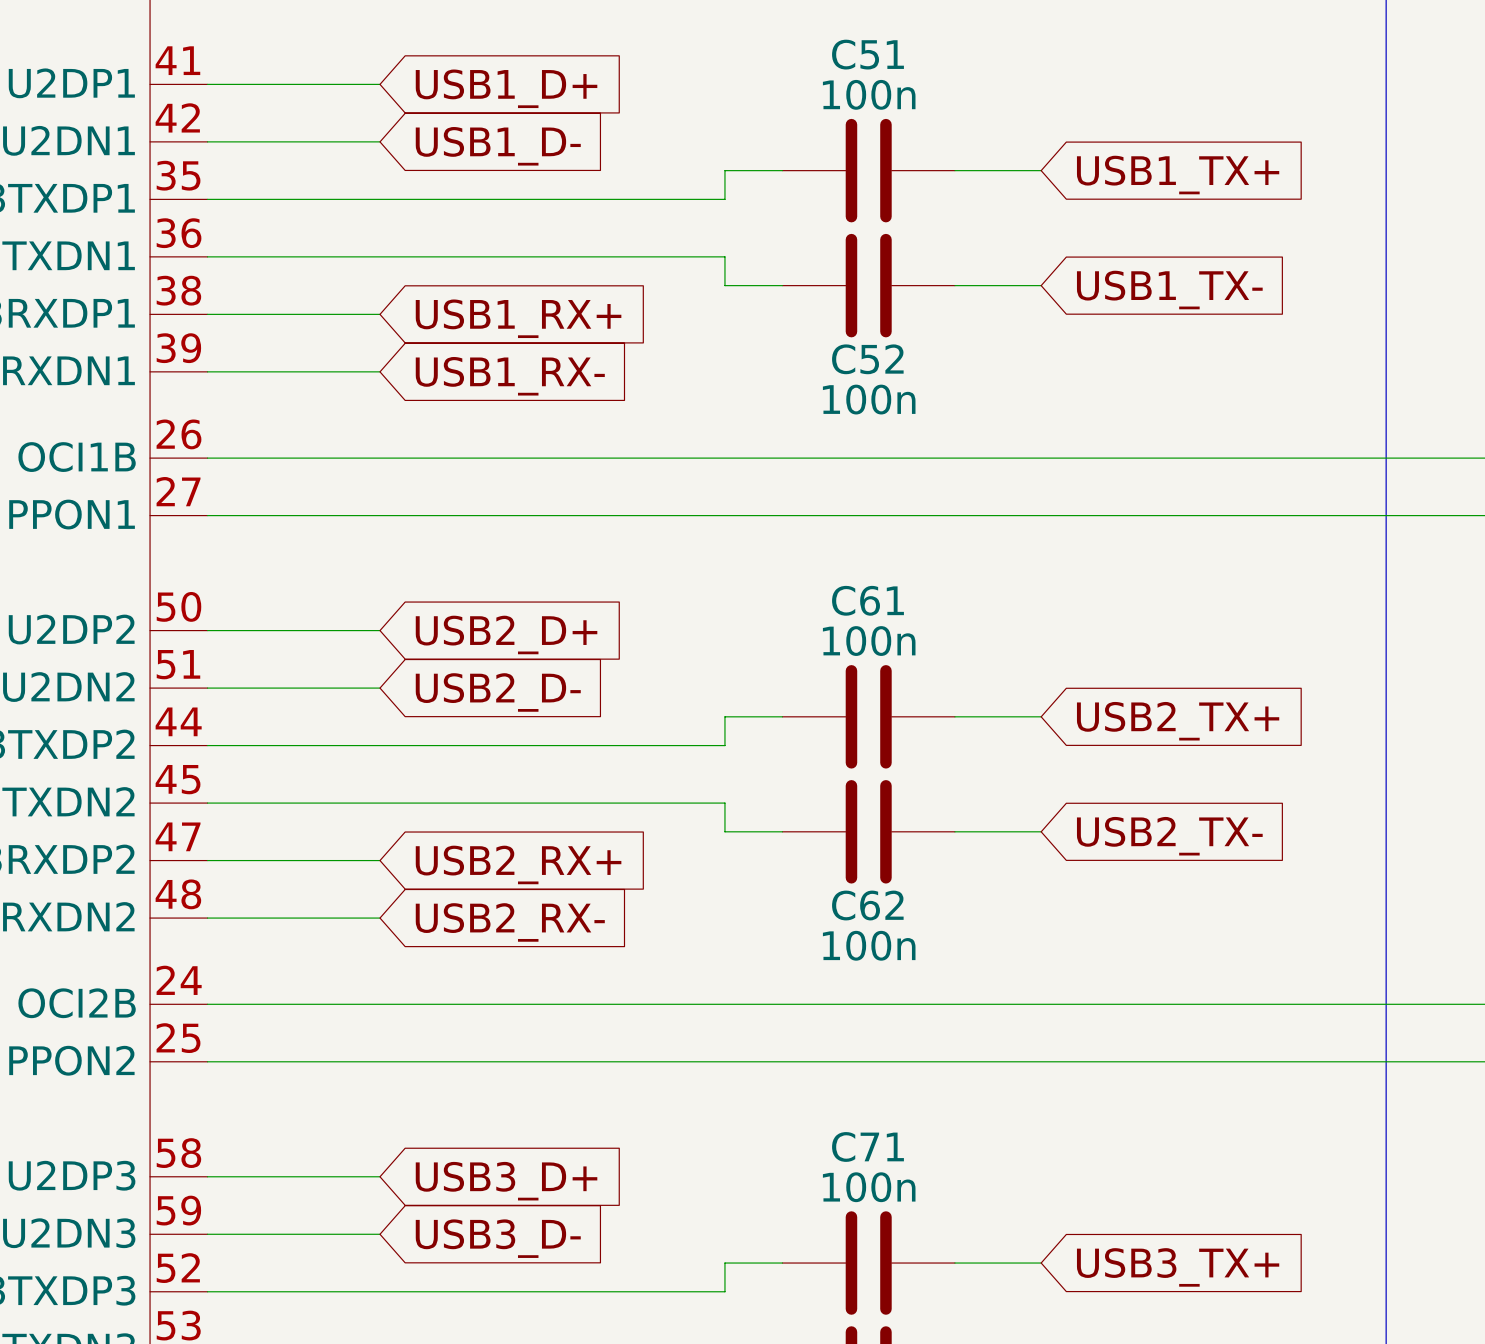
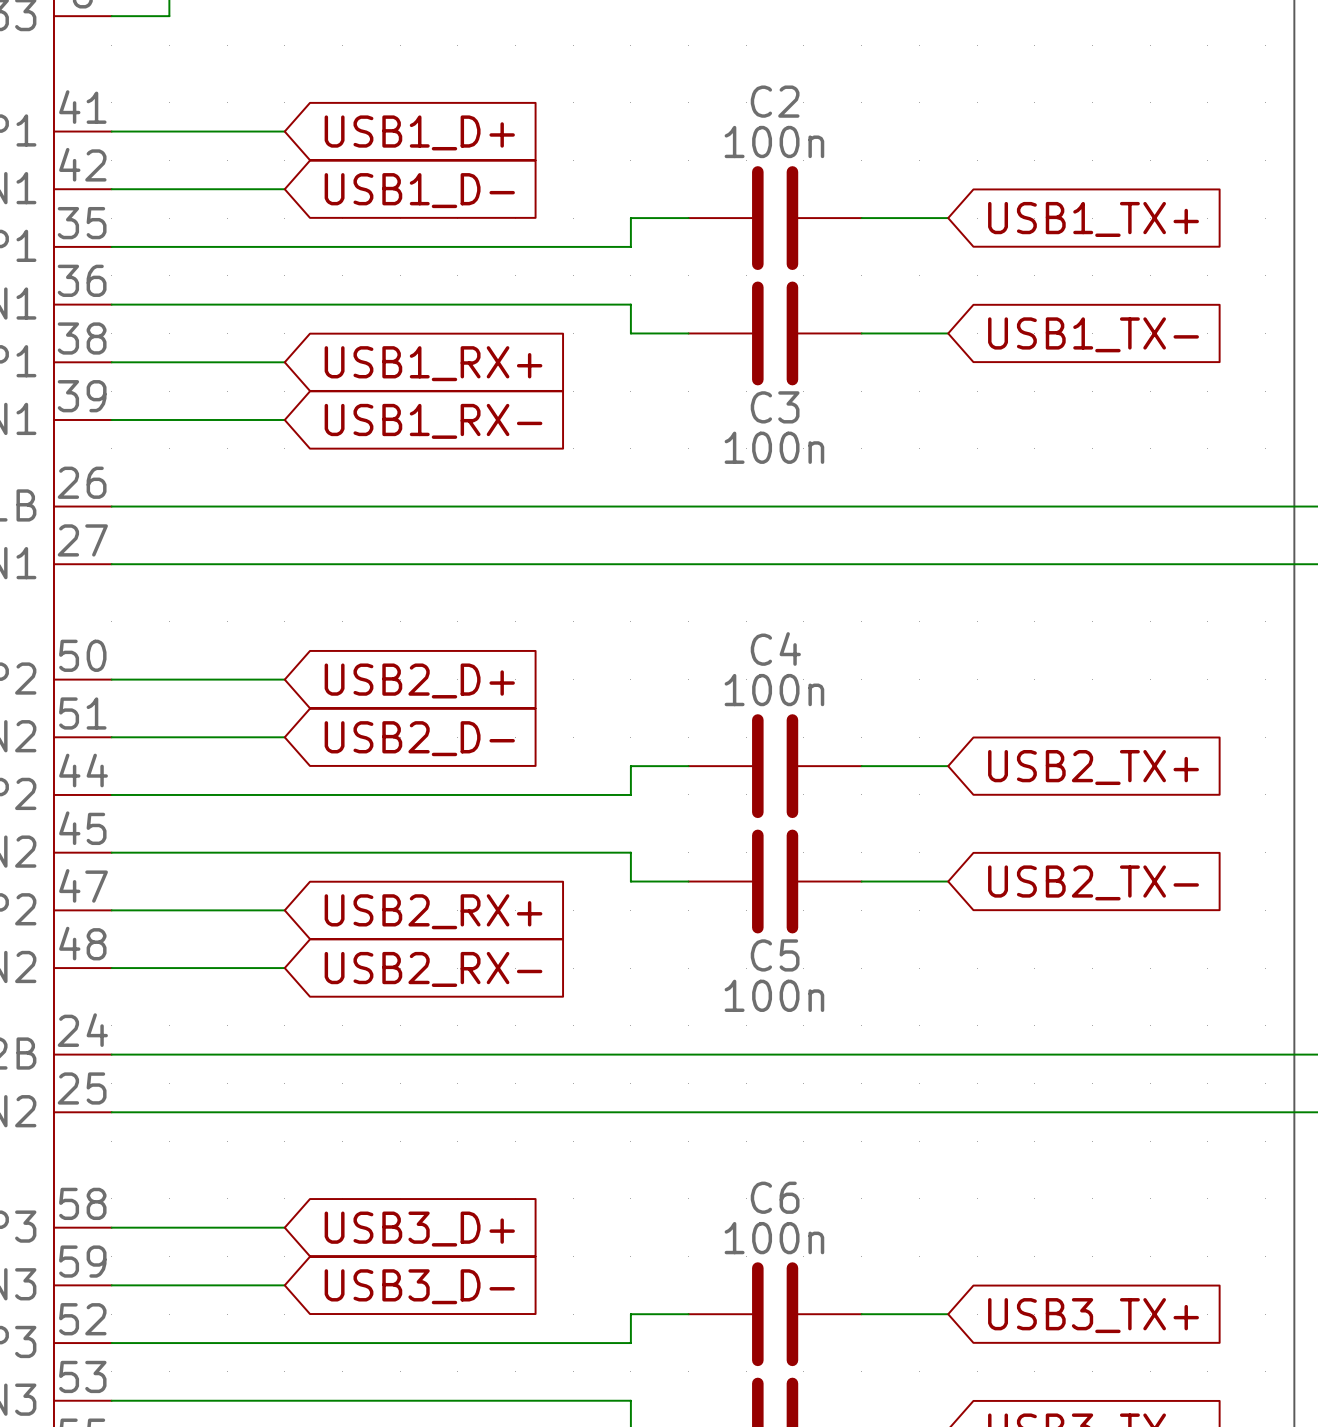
C51 name: C51 (867, 54) -> C2 (775, 101)
C52 name: C52 (867, 359) -> C3 (775, 407)
C61 name: C61 (867, 600) -> C4 (775, 648)
C62 name: C62 (867, 905) -> C5 (775, 955)
C71 name: C71 (867, 1146) -> C6 (775, 1197)

